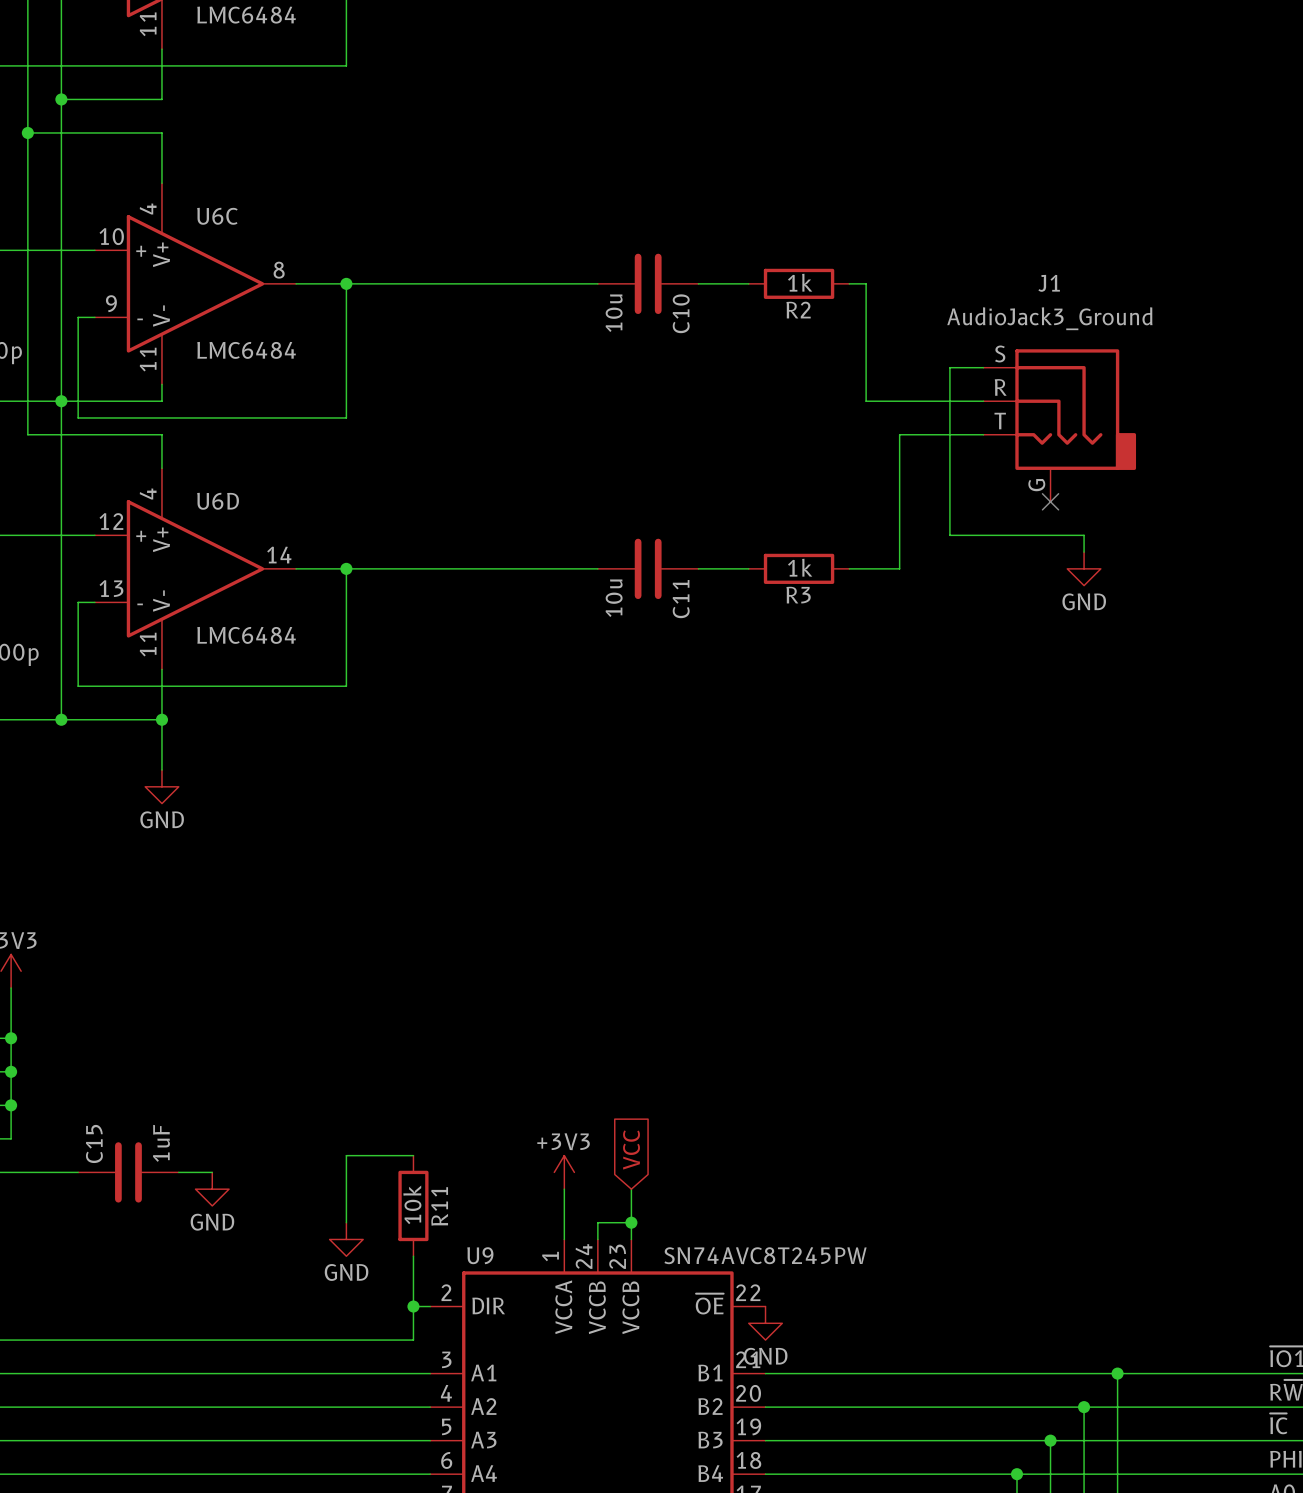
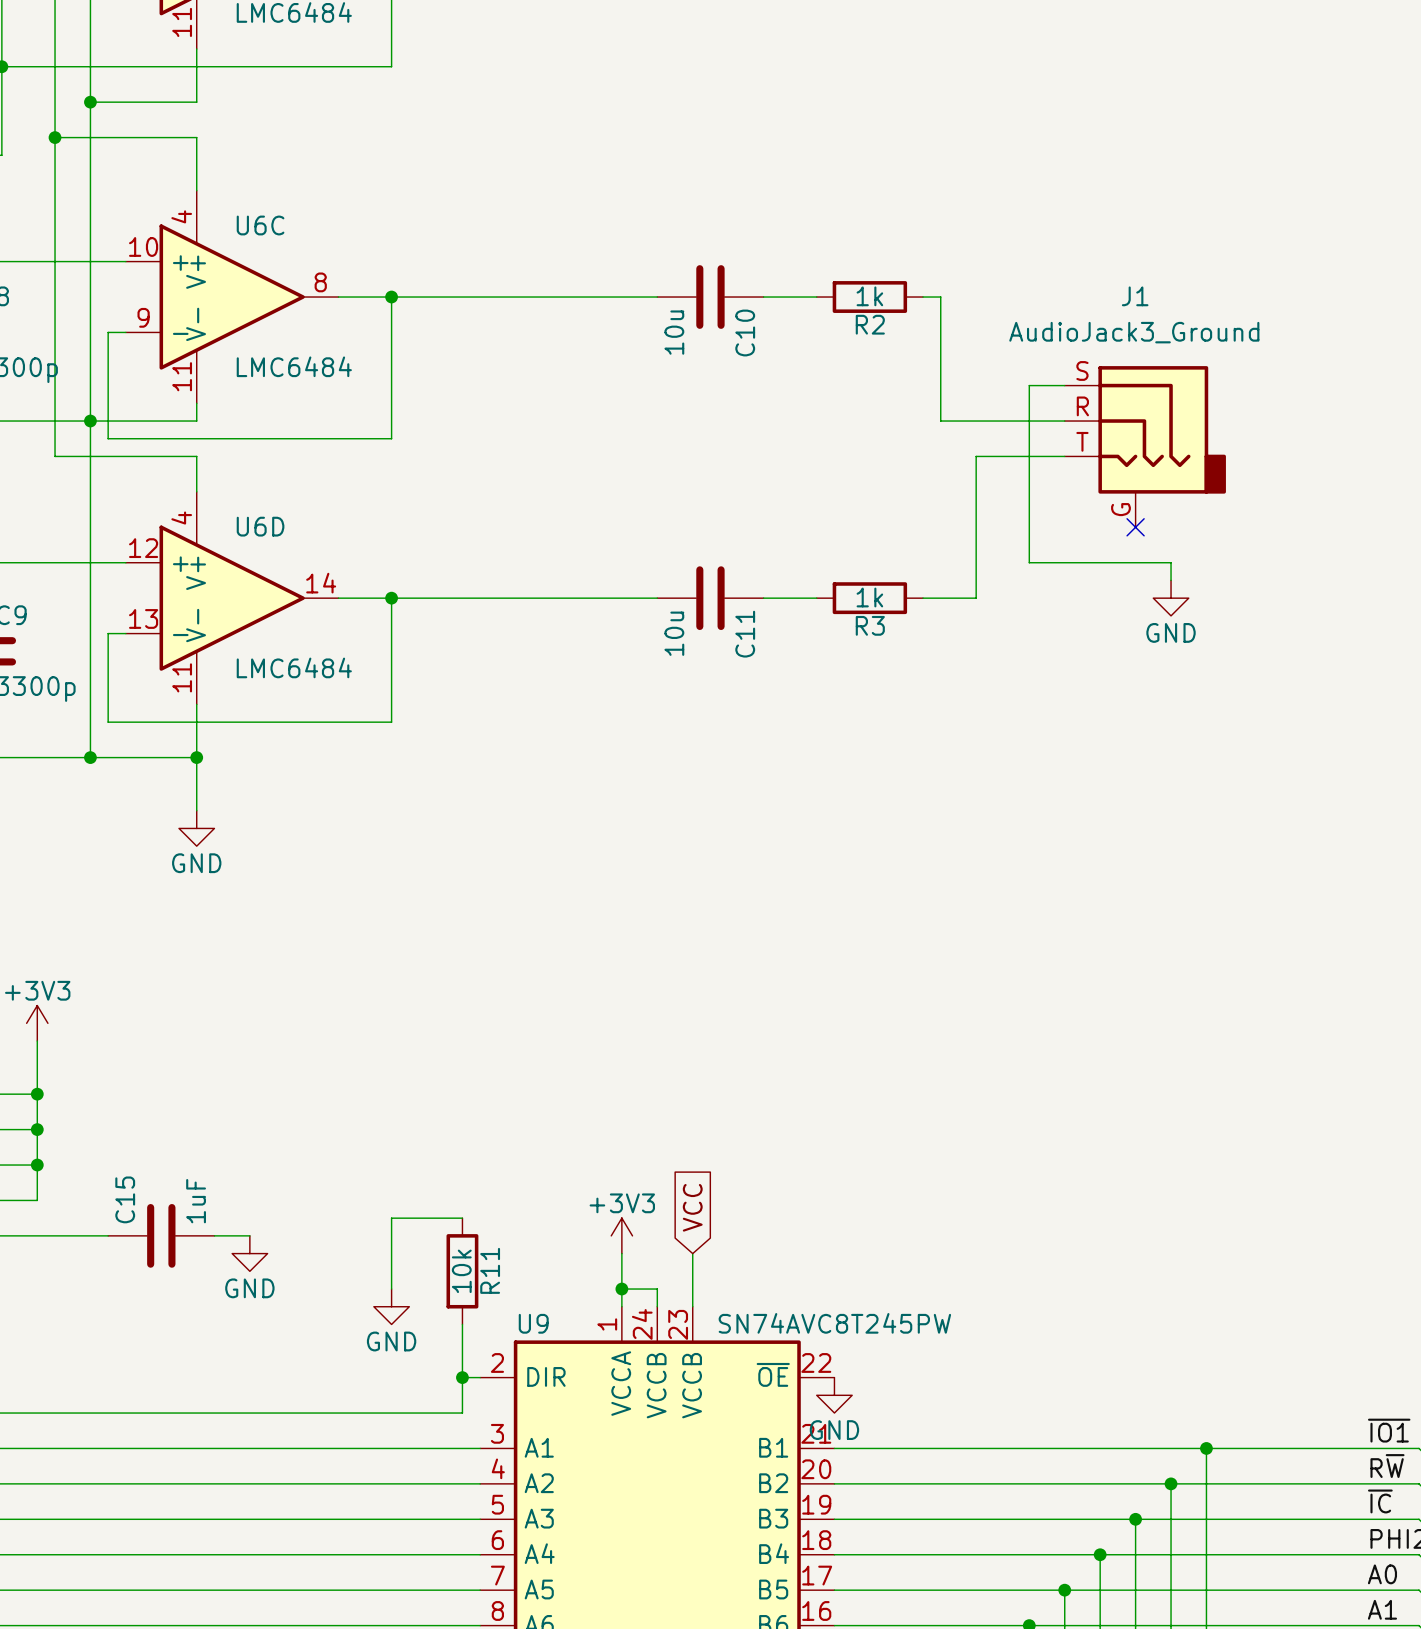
wire: (597, 1222) (631, 1222) -> (657, 1289) (621, 1289)
junction position: (631, 1222) -> (621, 1289)

